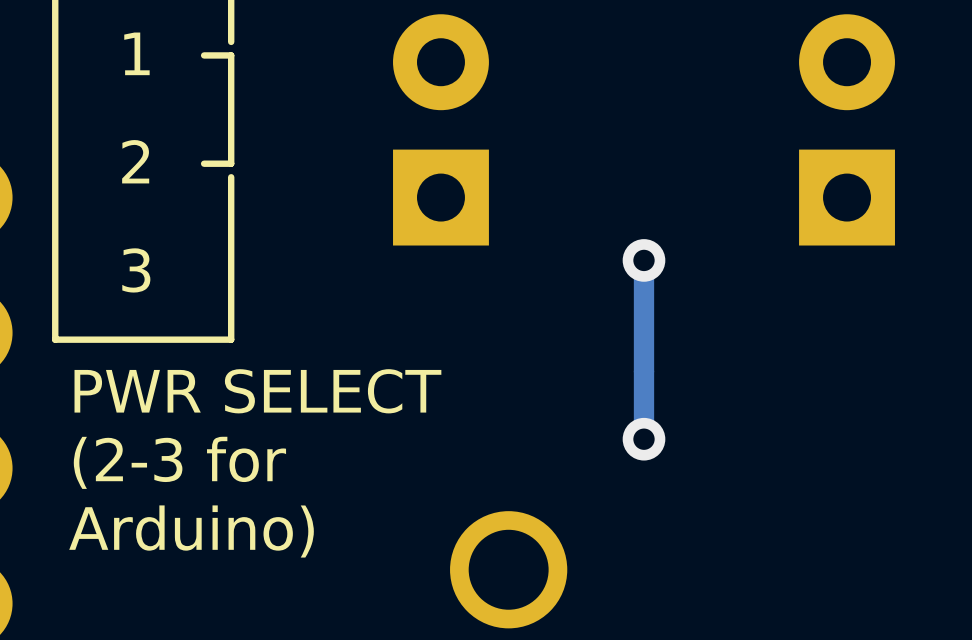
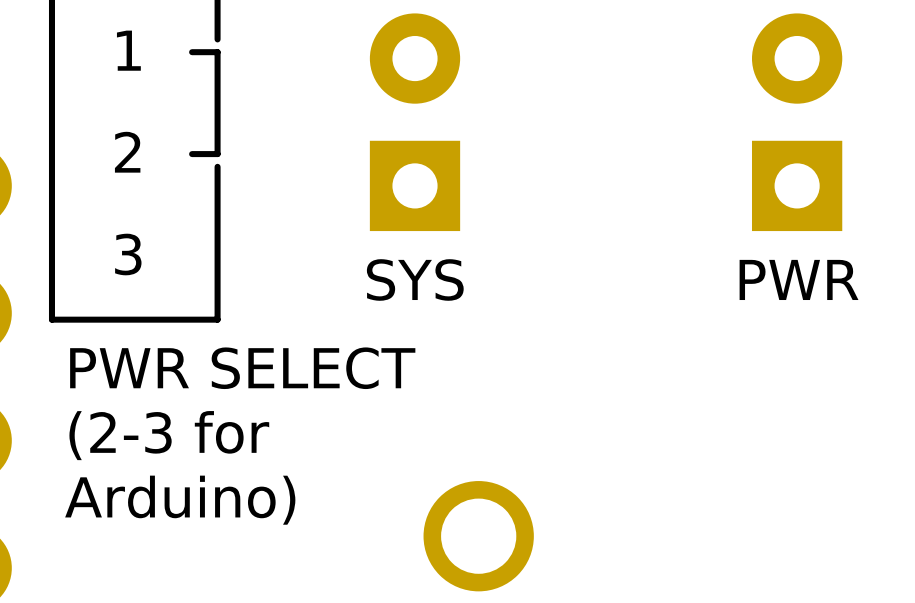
track: (644, 260) (644, 439) -> none
via: (644, 260) -> none
text: none -> SYS (415, 279)
text: none -> PWR (799, 279)
via: (644, 439) -> none

